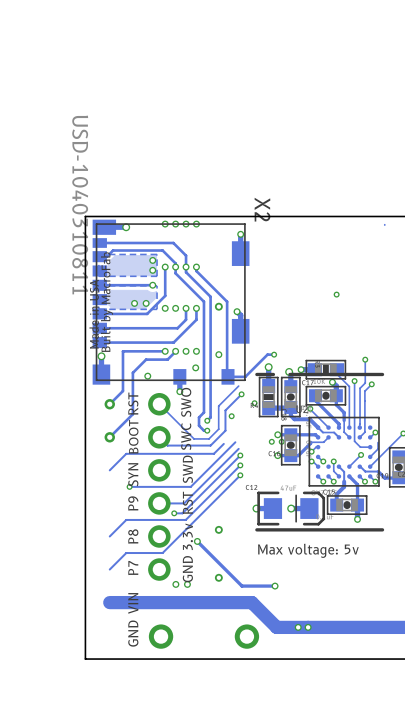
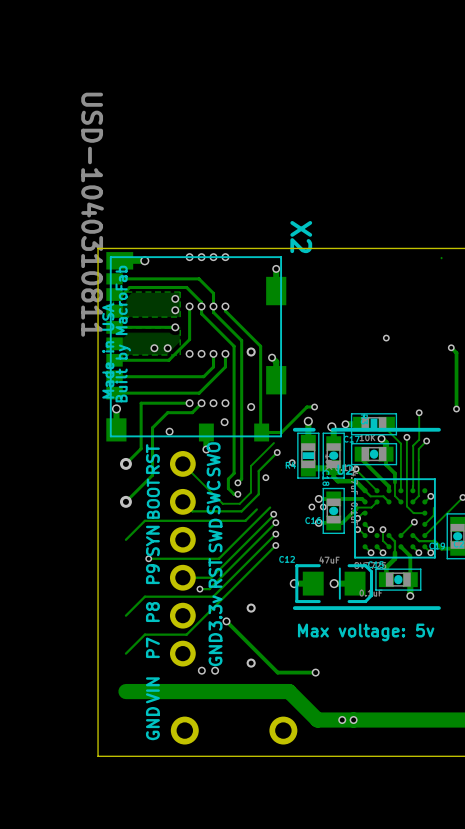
track: none -> (451, 347) (456, 353) (456, 409)
via: none -> (451, 347)
via: none -> (456, 409)
via: none -> (273, 514)

